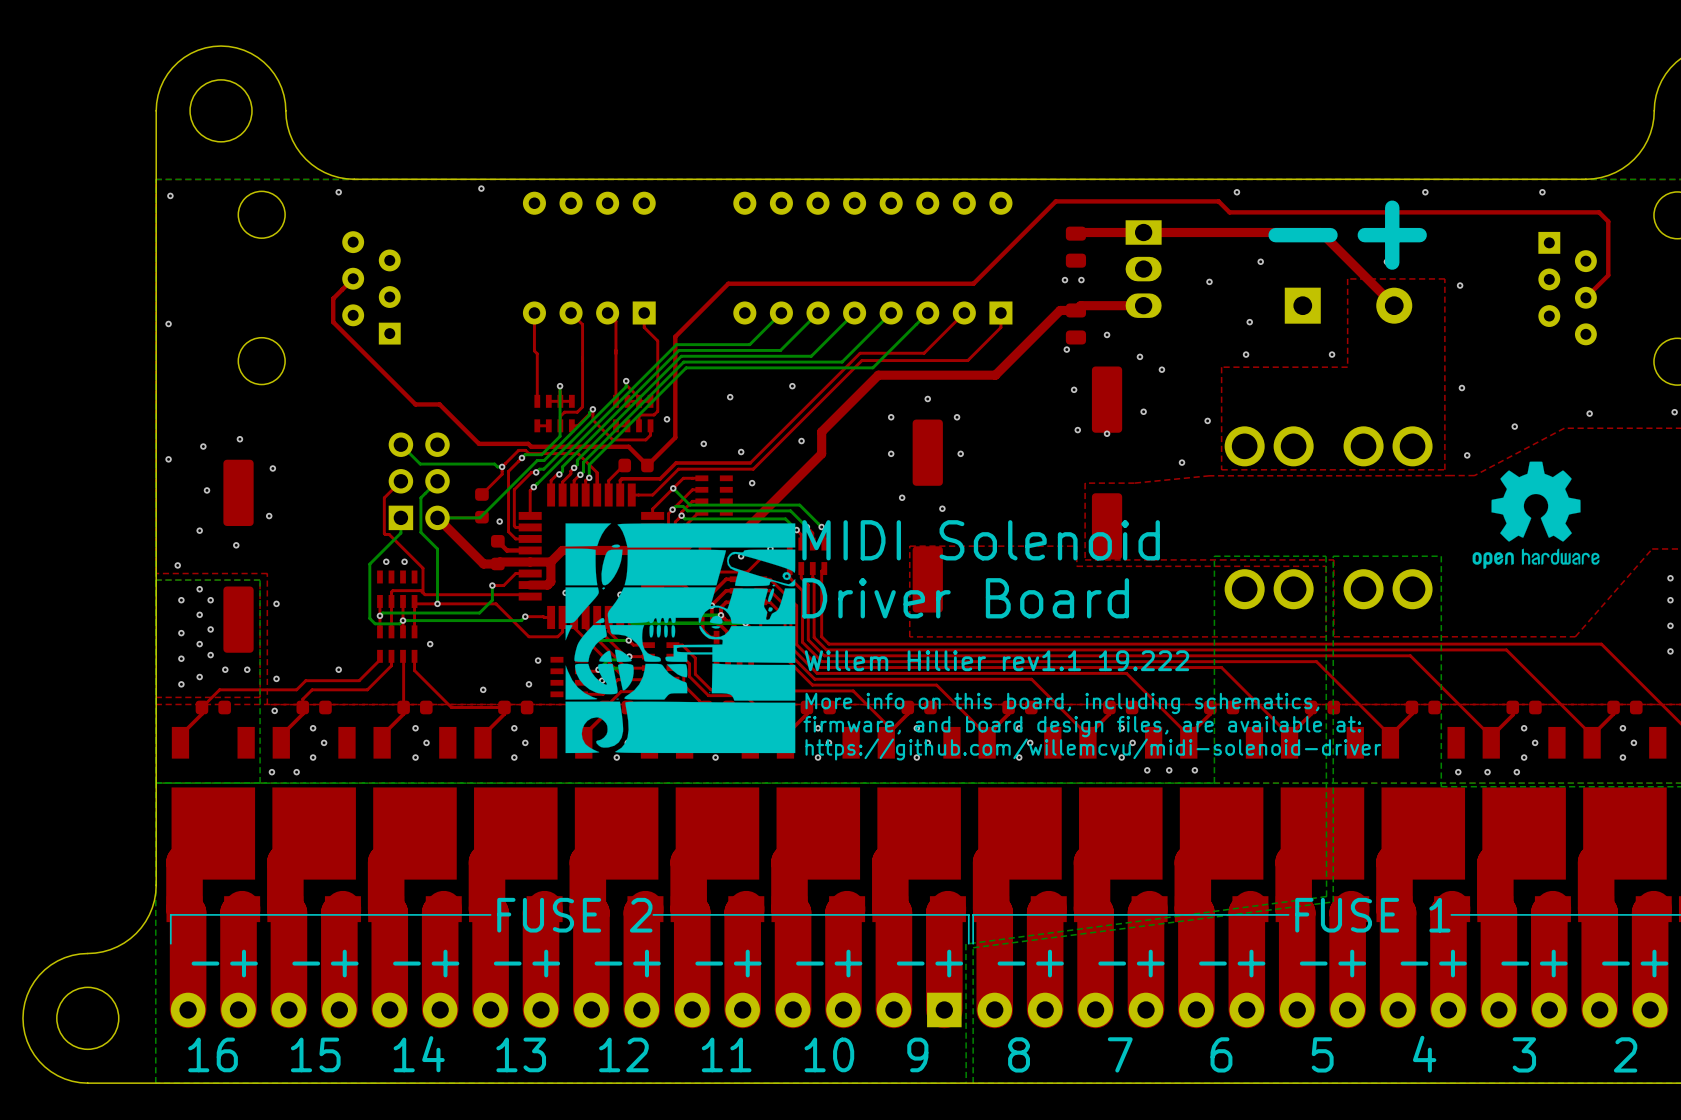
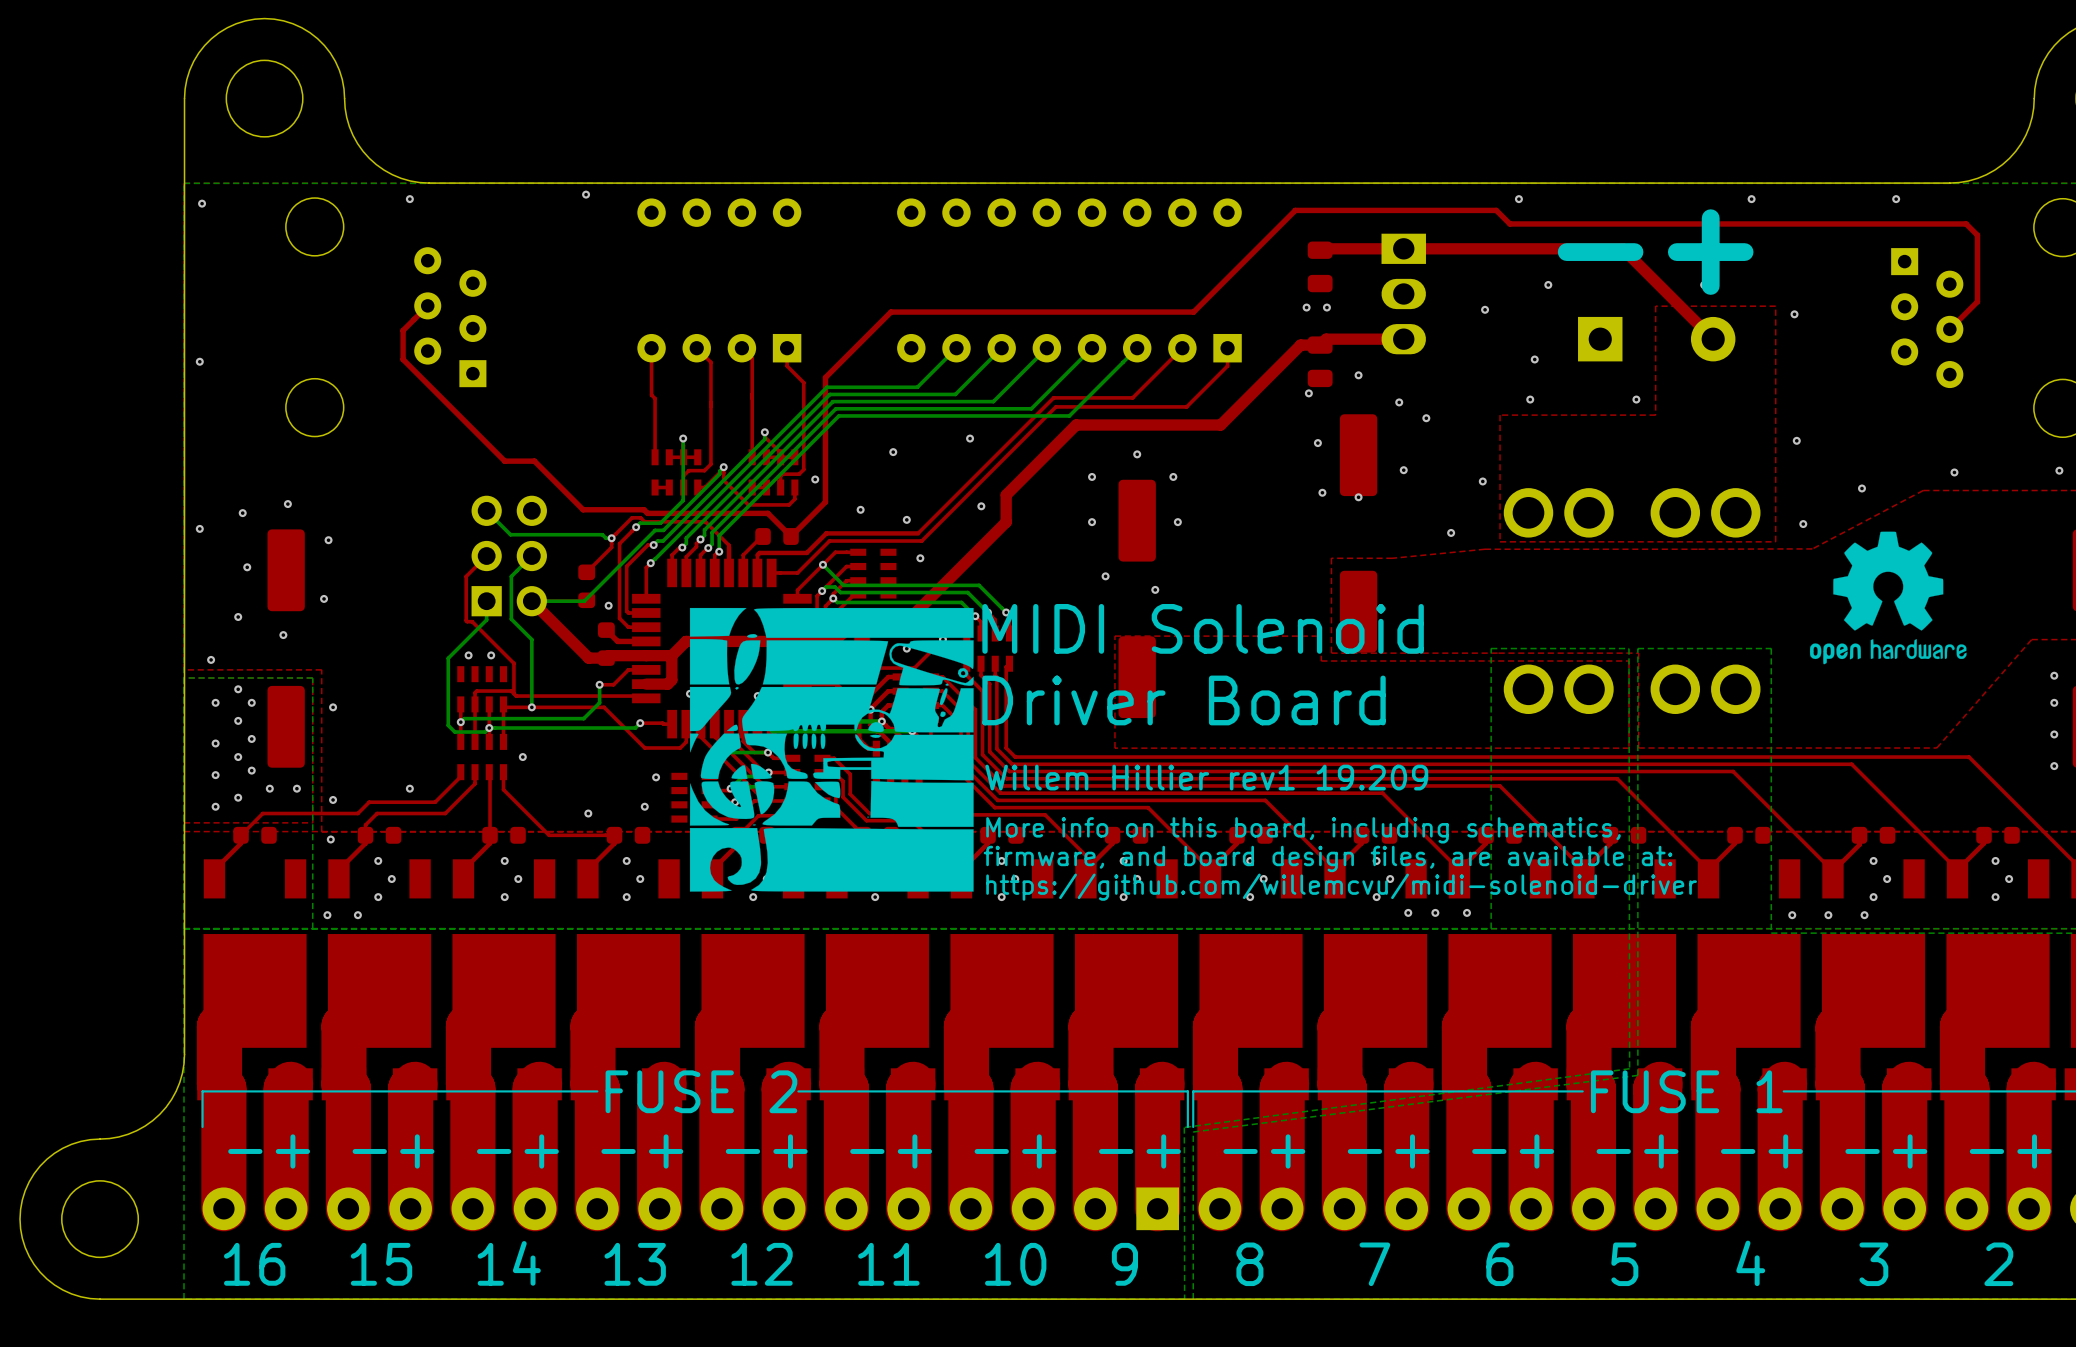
text: Willem Hillier rev1.1 19.222 (996, 660) -> Willem Hillier rev1 19.209 (1206, 777)

